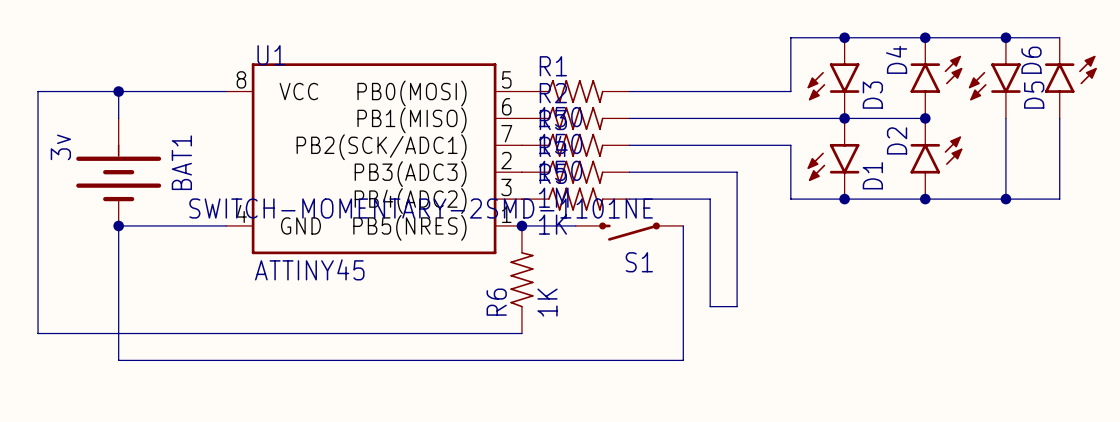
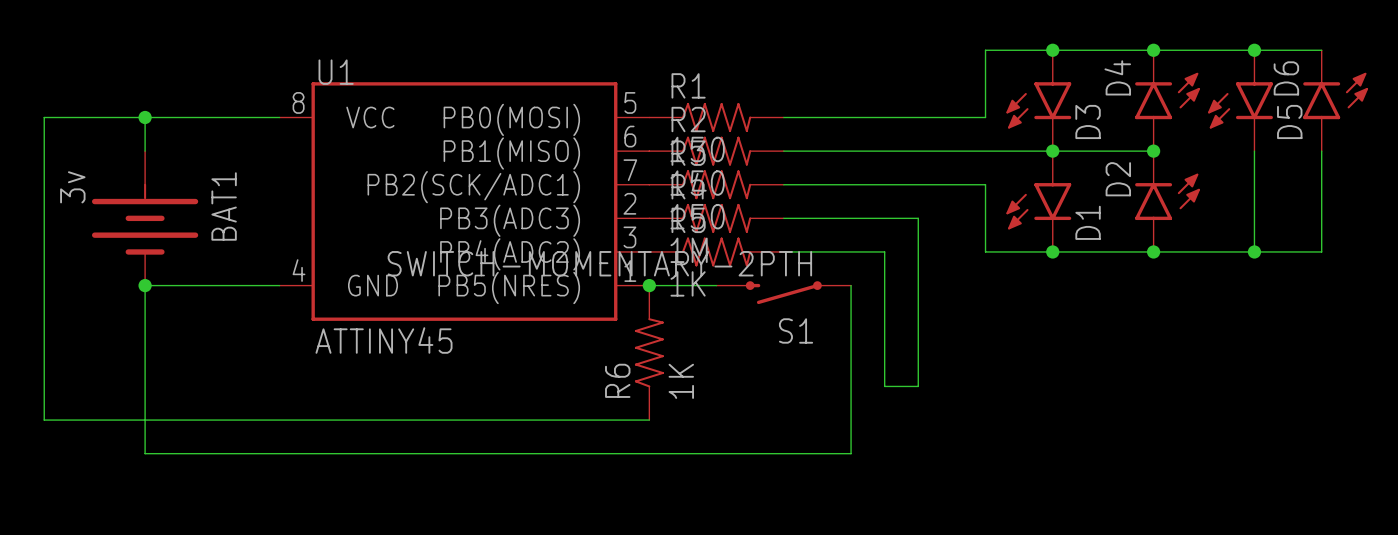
S1 value: SWITCH-MOMENTARY-2SMD-1101NE (421, 208) -> SWITCH-MOMENTARY-2PTH (599, 263)

